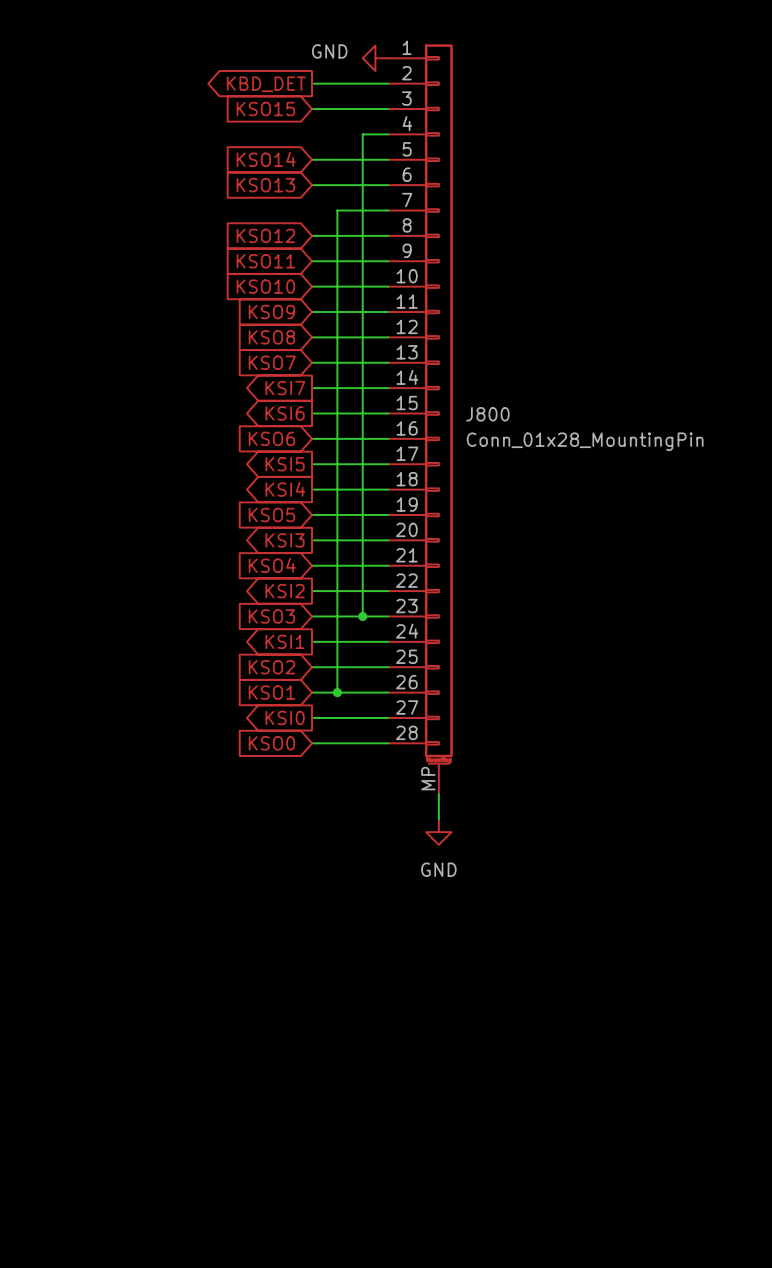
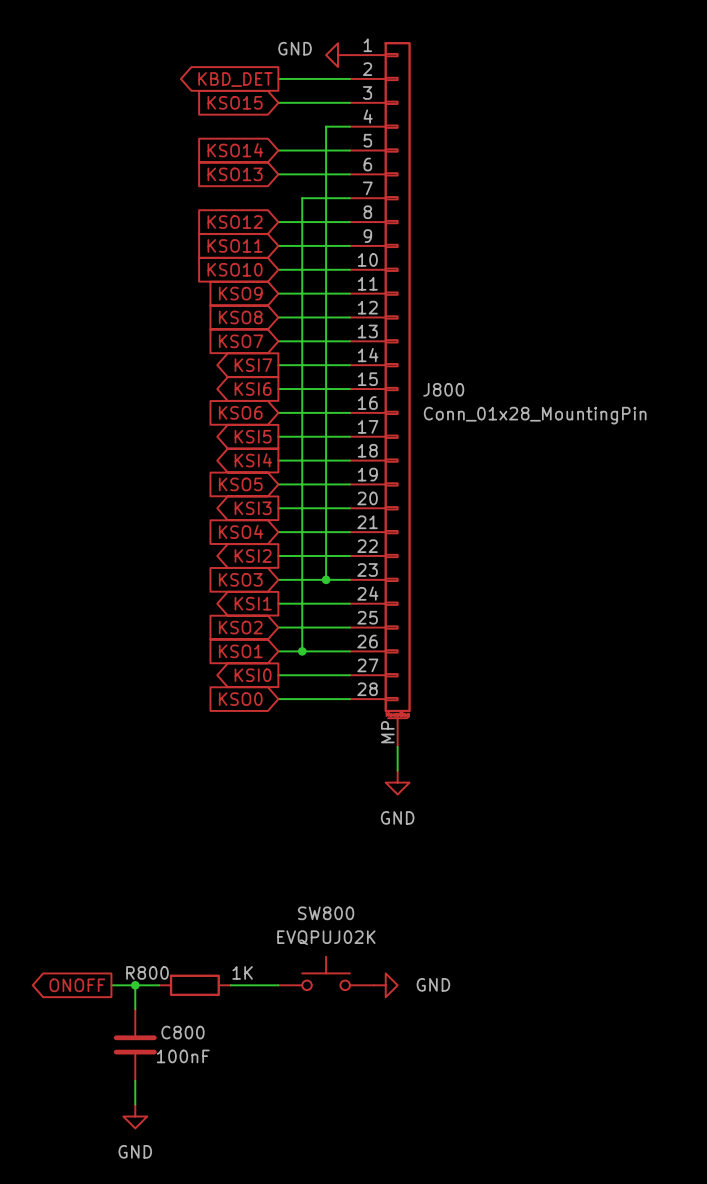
SW800: none -> EVQPUJ02K (326, 973)
global label: none -> ONOFF (77, 985)
wire: none -> (111, 985) (159, 985)
wire: none -> (135, 985) (135, 1009)
junction: none -> (135, 985)
R800: none -> 1K (194, 985)
wire: none -> (230, 985) (278, 985)
power symbol: none -> GND (385, 985)
C800: none -> 100nF (135, 1044)
wire: none -> (135, 1080) (135, 1104)
power symbol: none -> GND (135, 1116)

